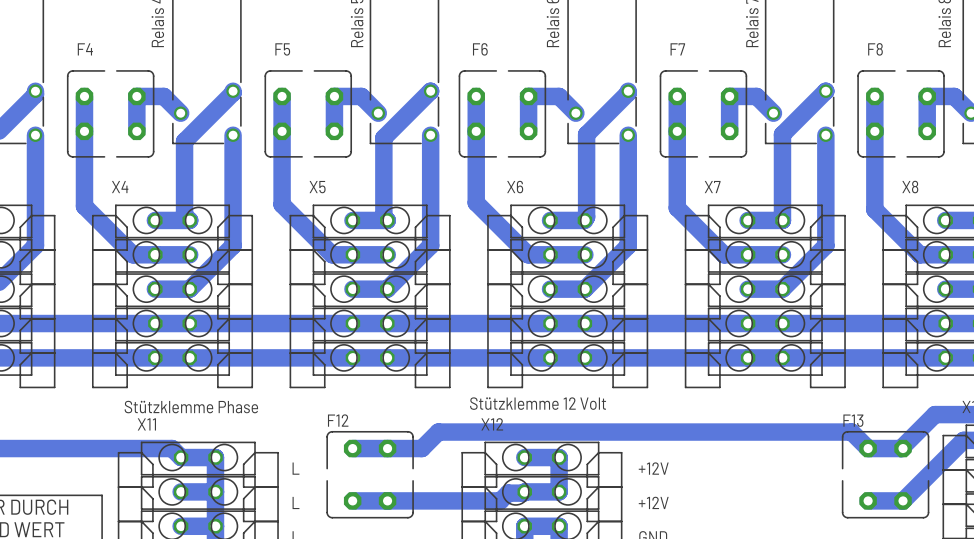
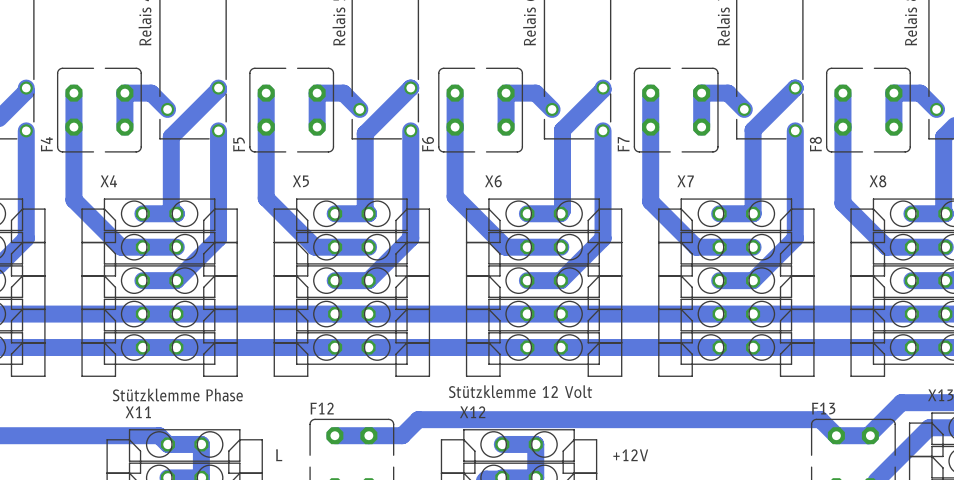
F4 name rotation: 0° (85, 49) -> 90° counterclockwise (46, 144)
F4 name position: F4 (85, 49) -> F4 (46, 144)
F5 name rotation: 0° (282, 49) -> 90° counterclockwise (239, 144)
F5 name position: F5 (282, 49) -> F5 (239, 144)
F6 name rotation: 0° (480, 49) -> 90° counterclockwise (428, 144)
F6 name position: F6 (480, 49) -> F6 (428, 144)
F7 name rotation: 0° (677, 49) -> 90° counterclockwise (623, 144)
F7 name position: F7 (677, 49) -> F7 (623, 144)
F8 name rotation: 0° (875, 49) -> 90° counterclockwise (815, 144)
F8 name position: F8 (875, 49) -> F8 (815, 144)

